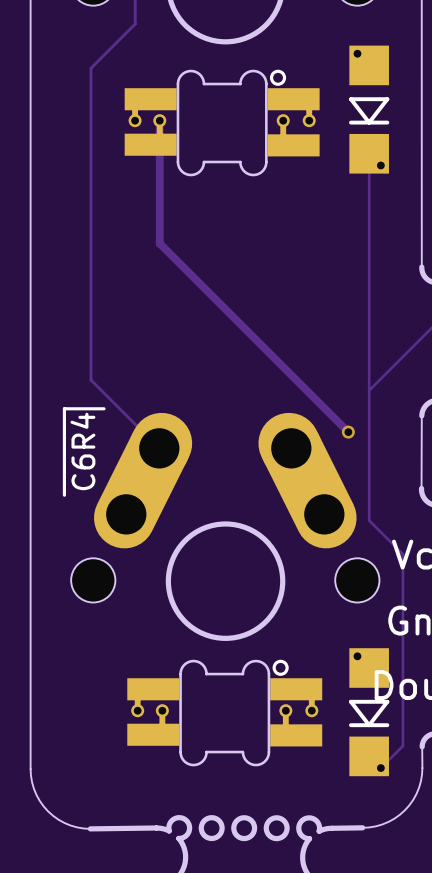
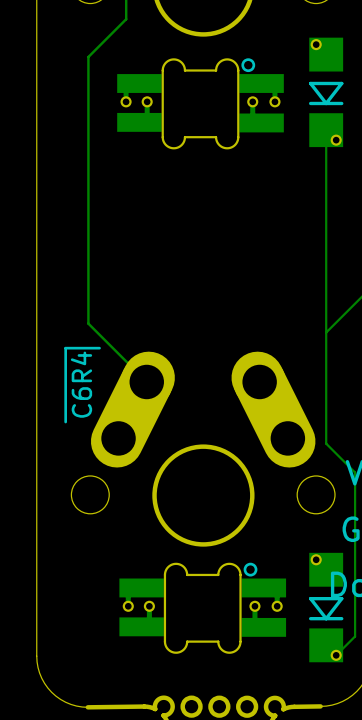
track: (159, 120) (159, 243) (348, 432) -> none
via: (348, 432) -> none

